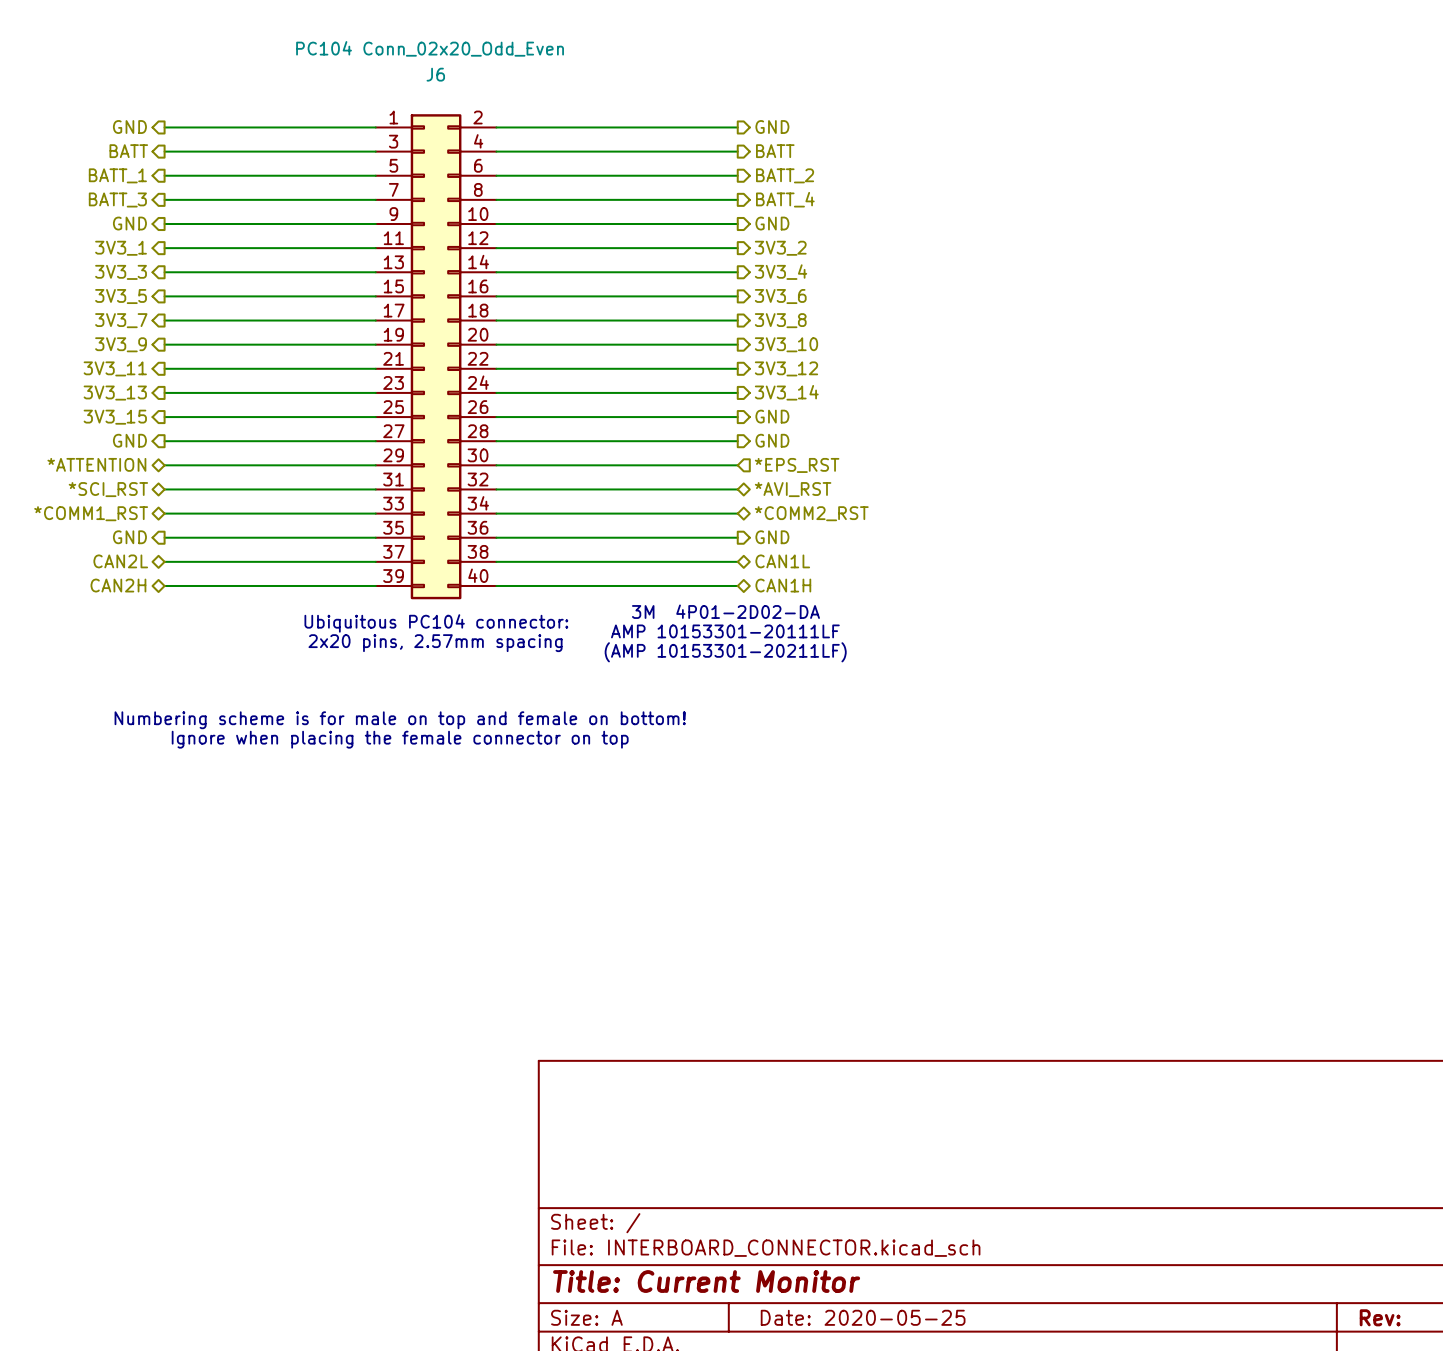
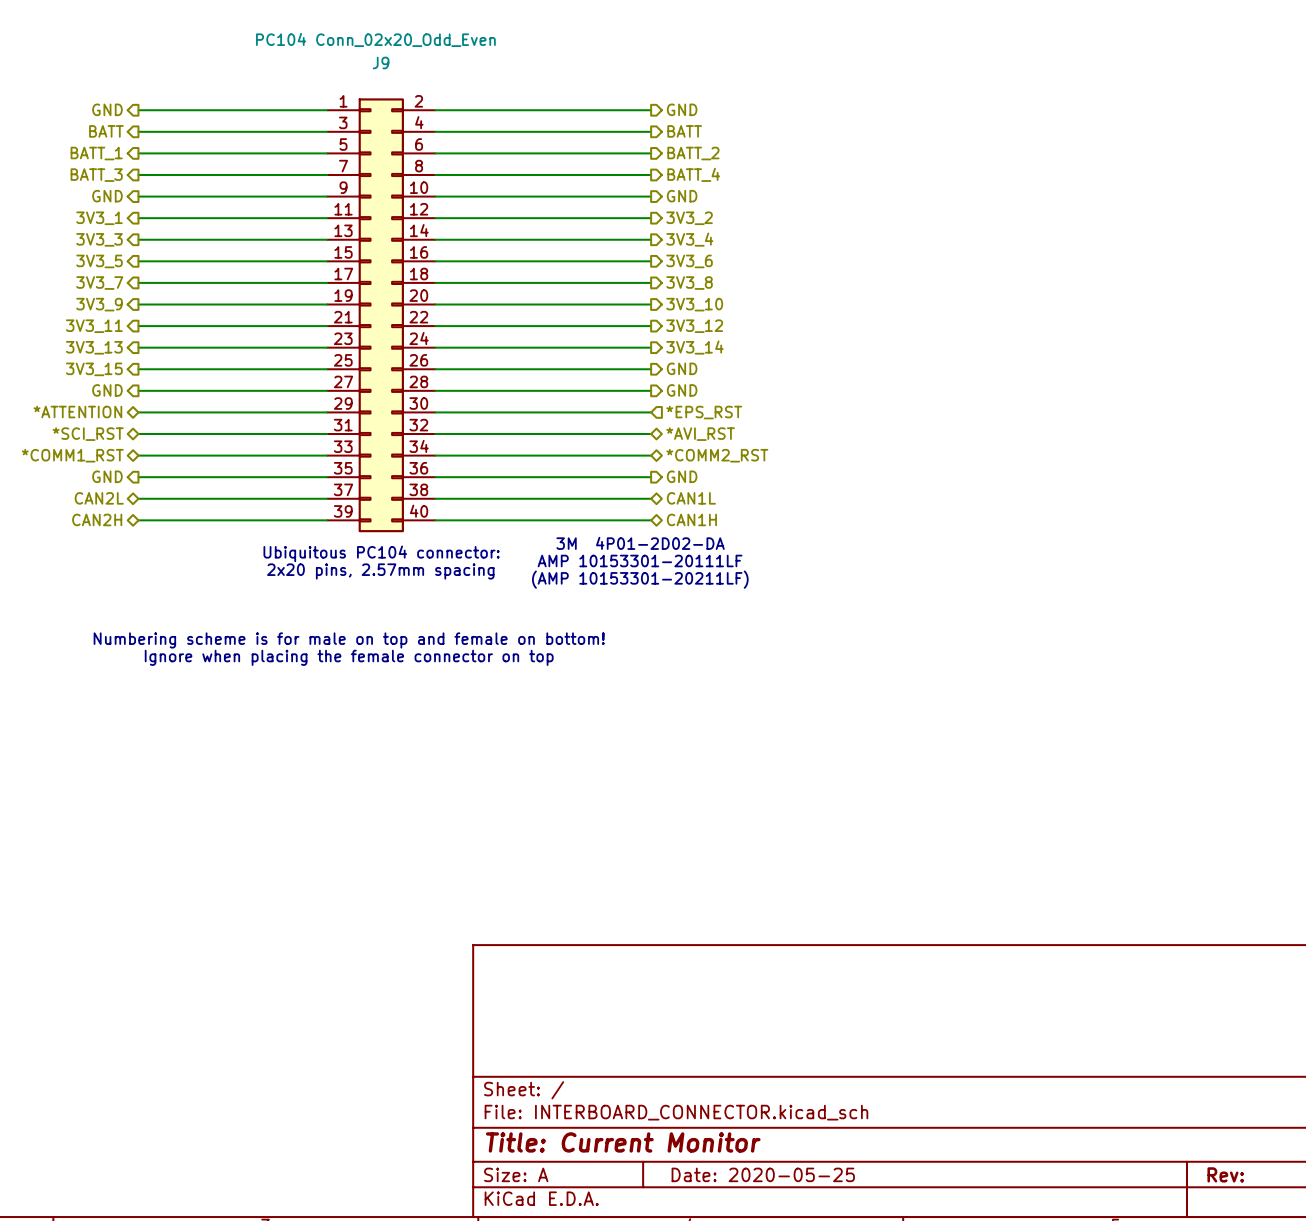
J6 name: J6 (435, 74) -> J9 (381, 62)

